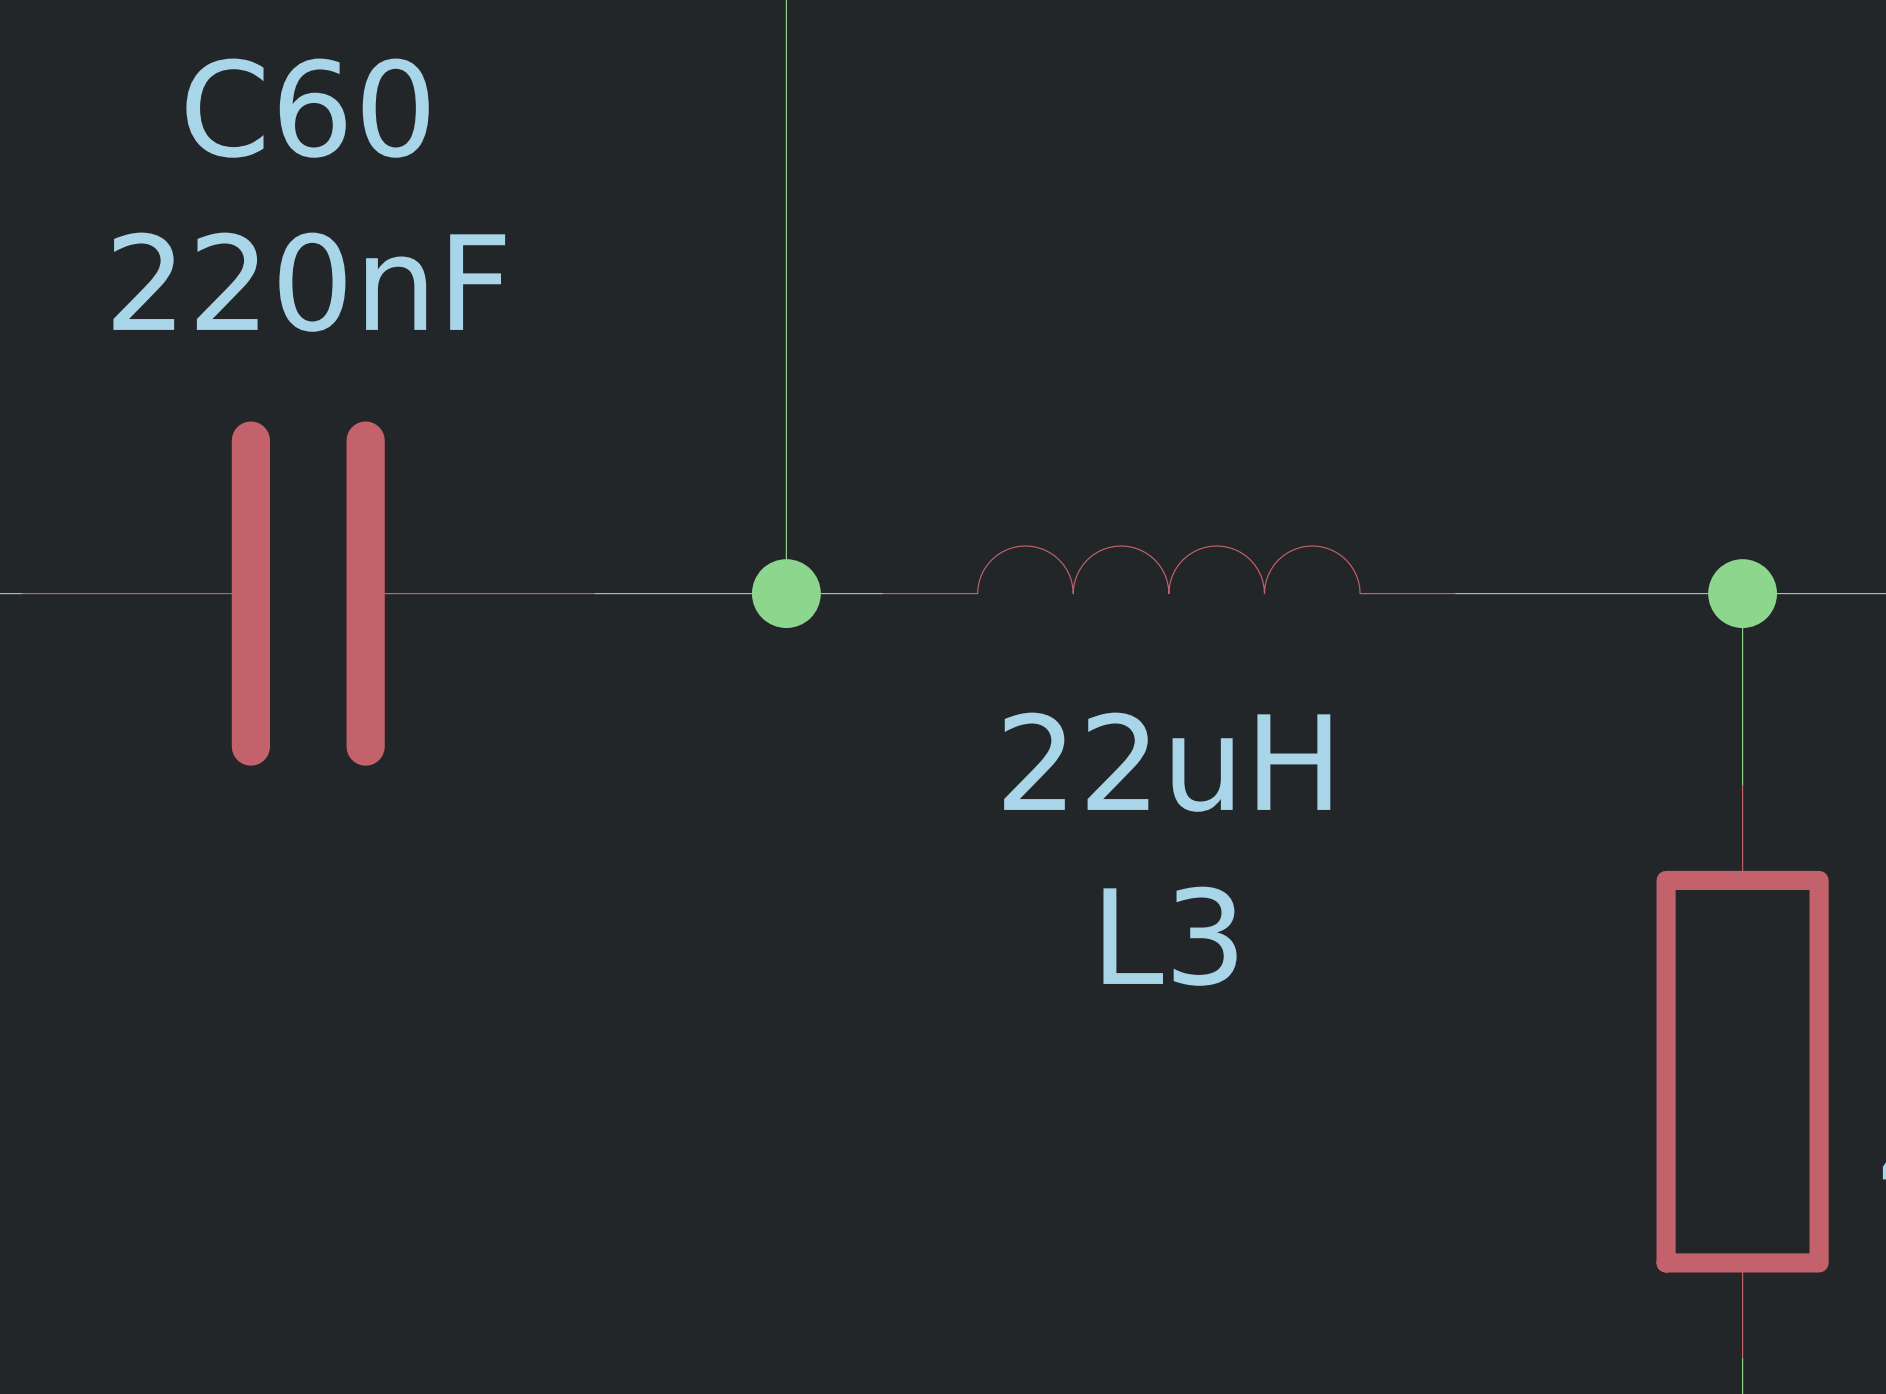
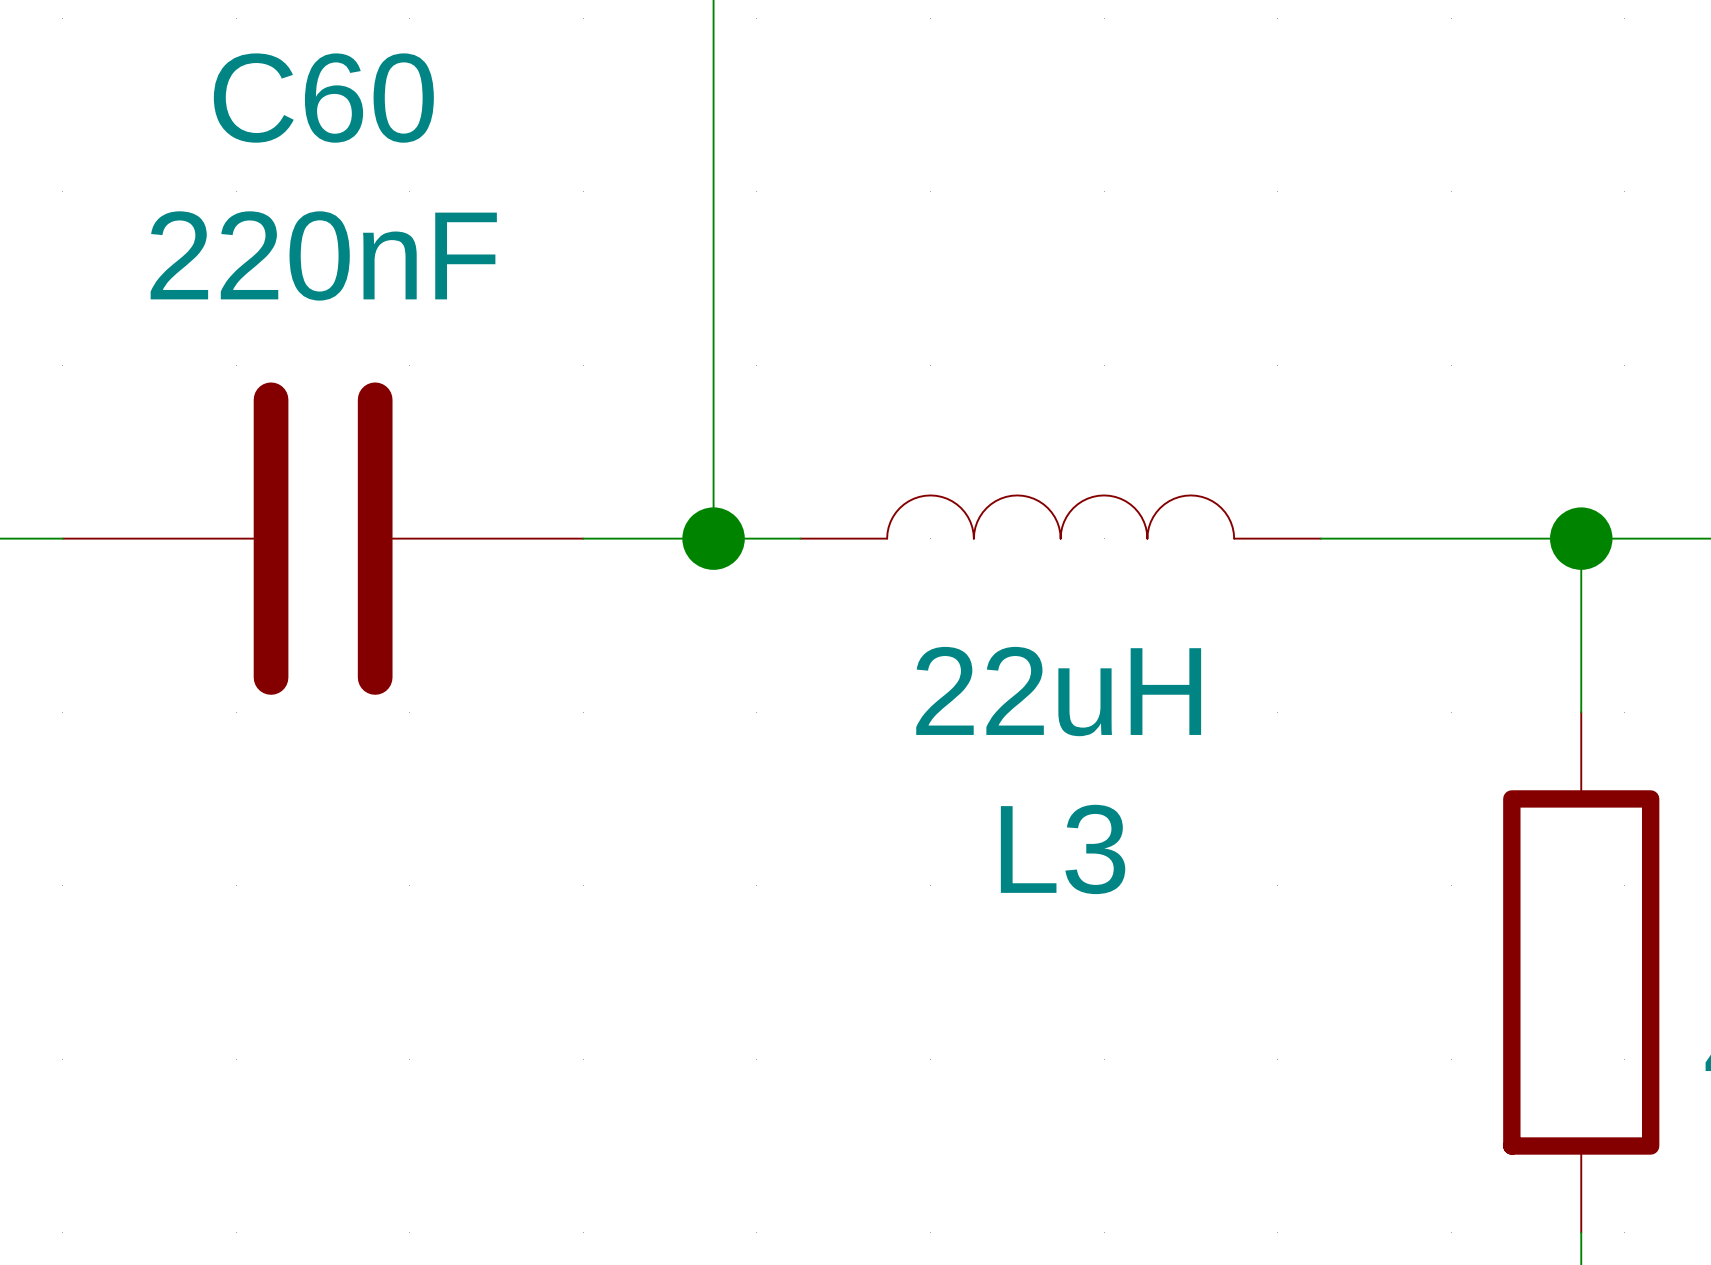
C60 position: (308, 593) -> (323, 538)

